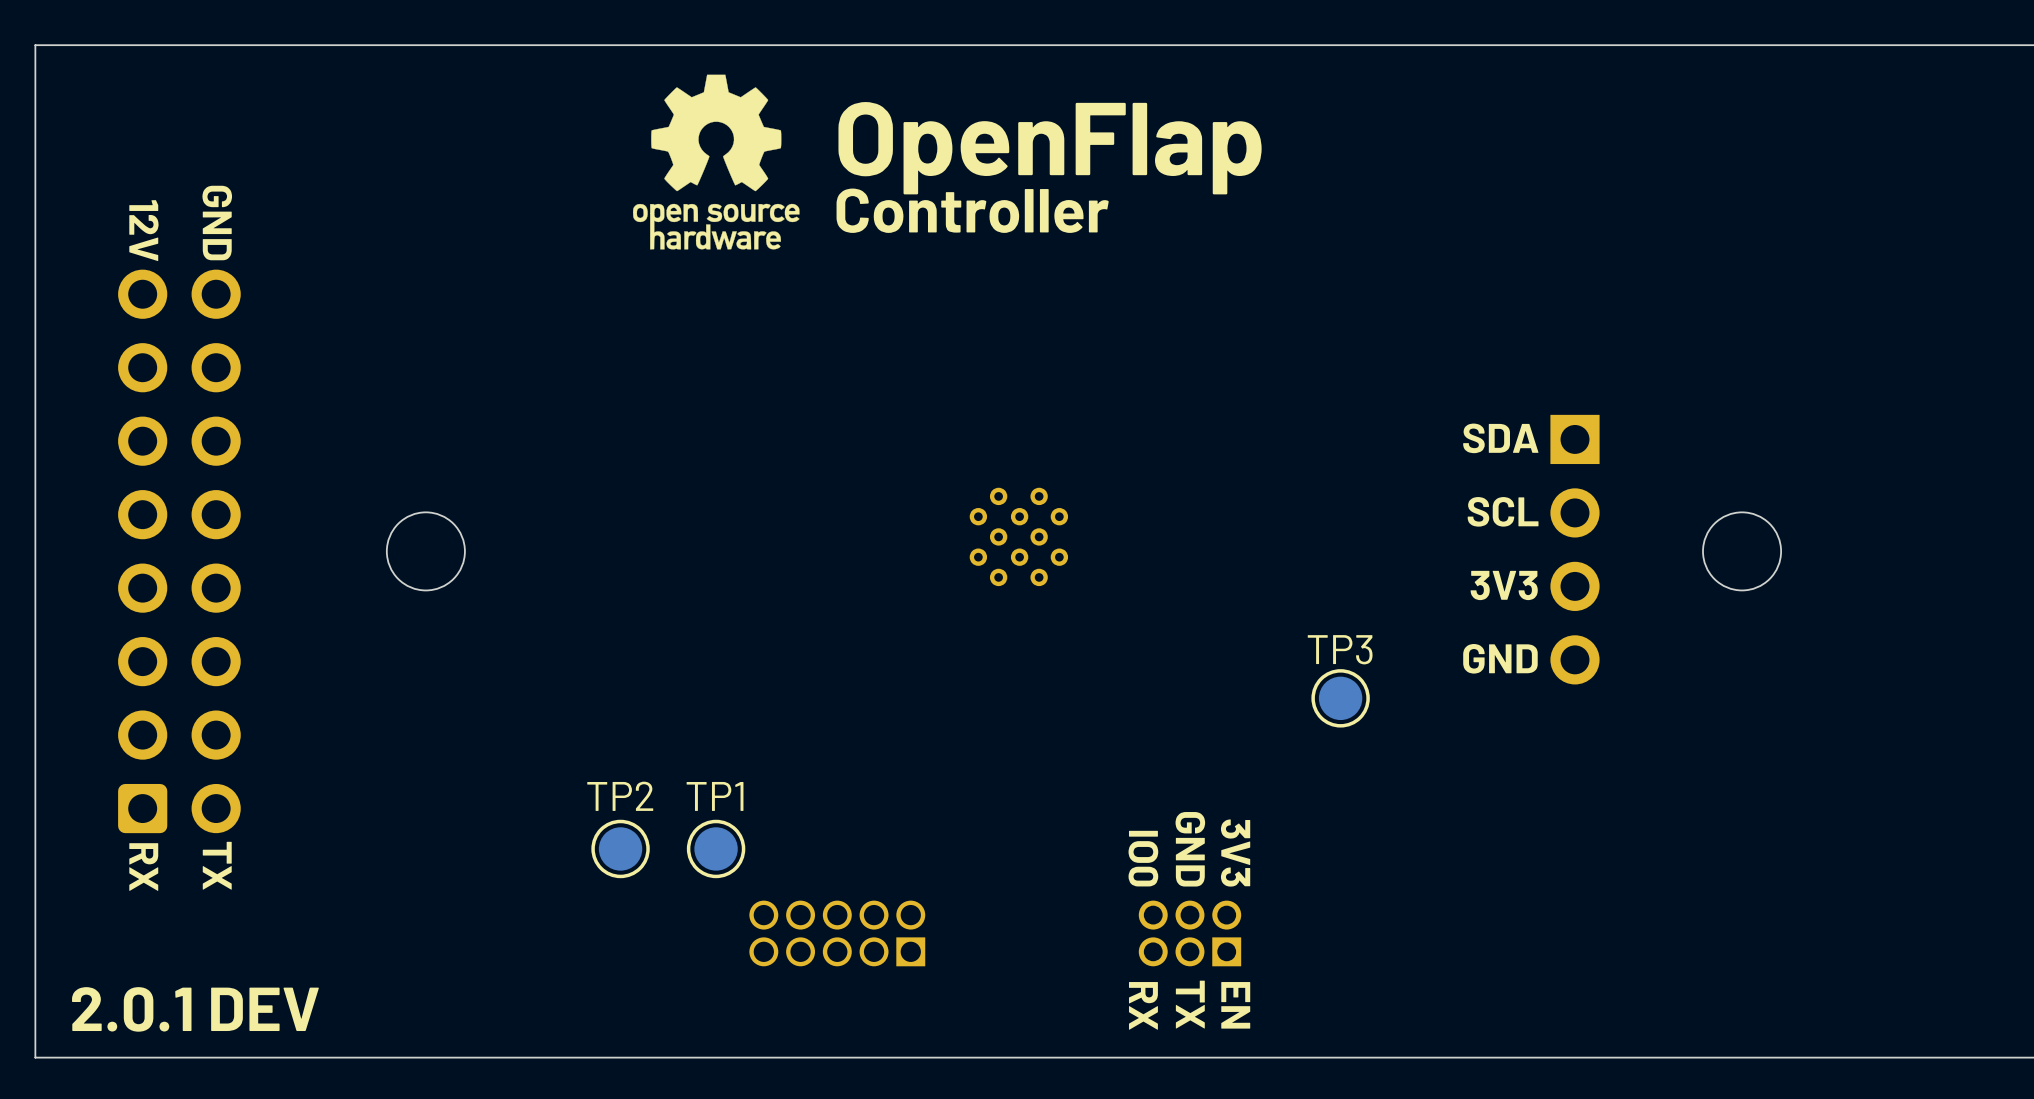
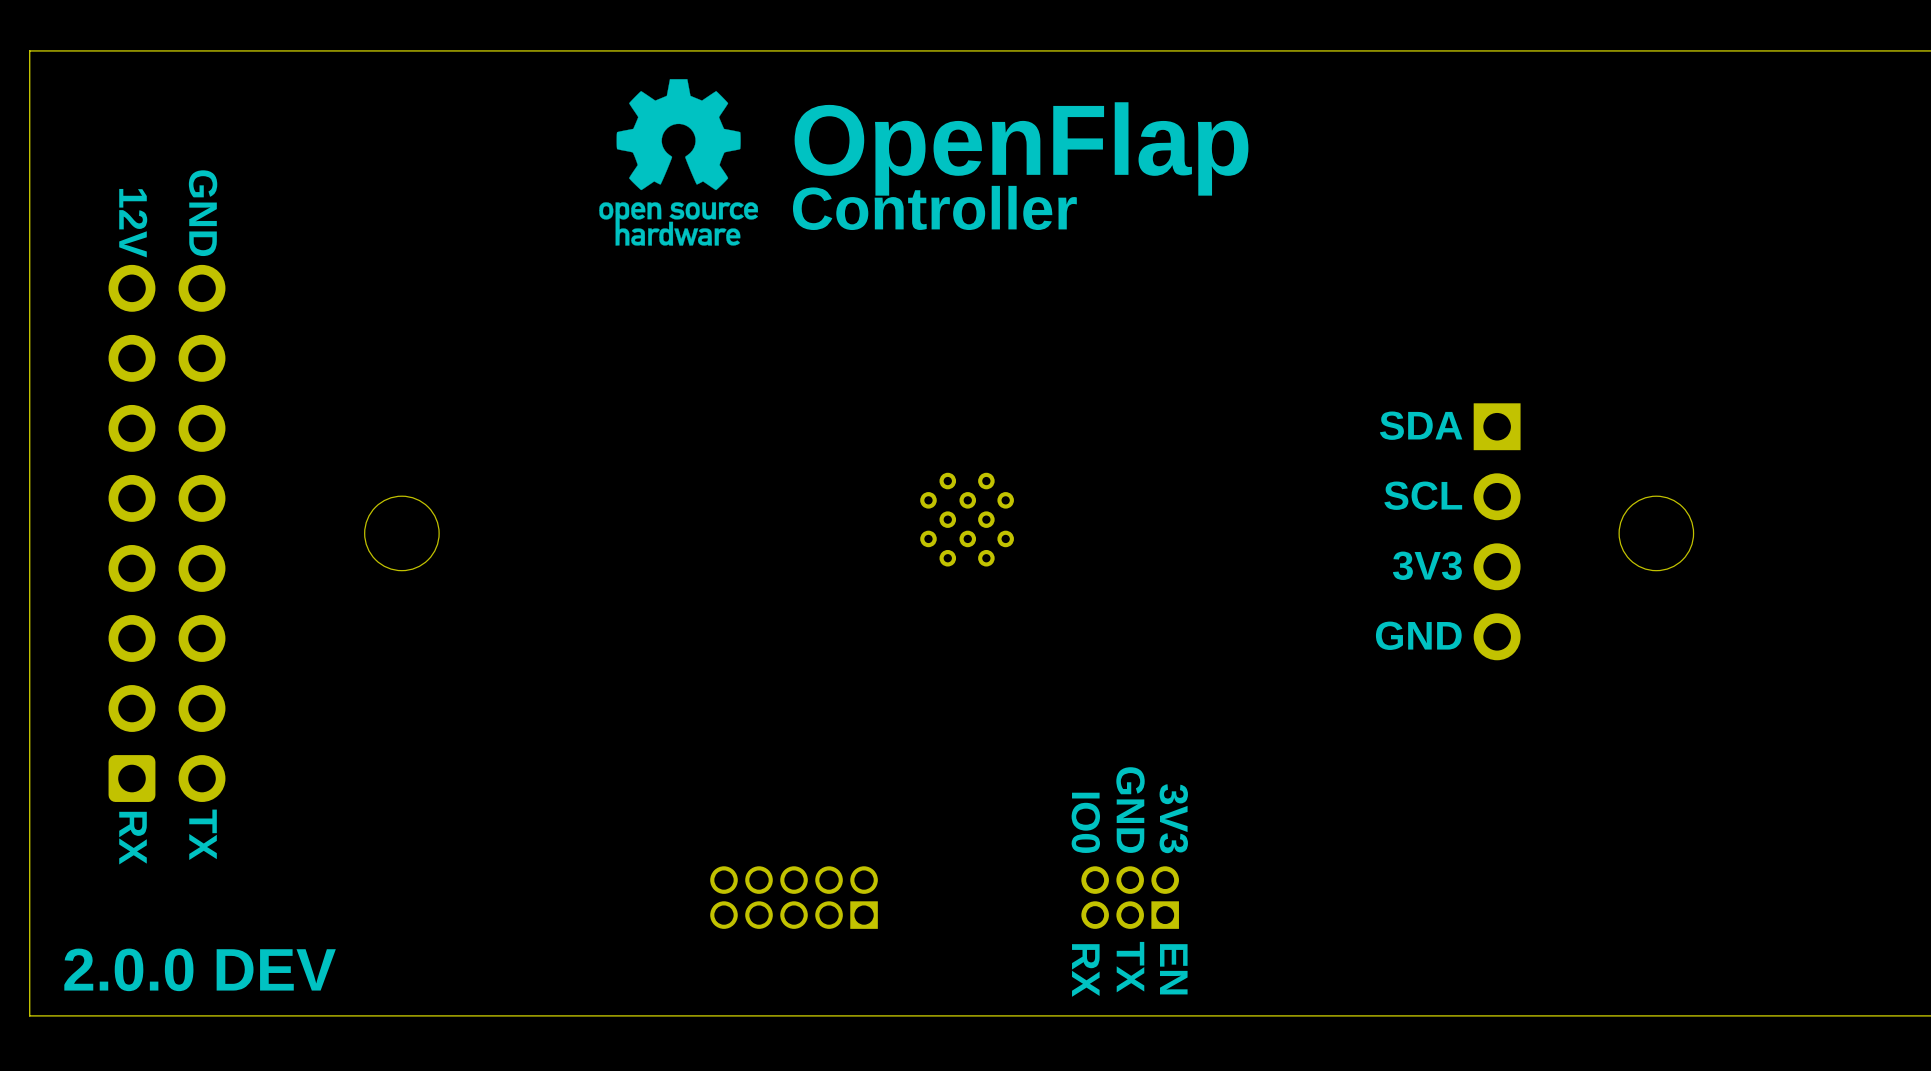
TP3: (1340, 698) -> none
TP2: (620, 848) -> none
TP1: (716, 848) -> none
text: 2.0.1 DEV (195, 1009) -> 2.0.0 DEV (200, 969)

